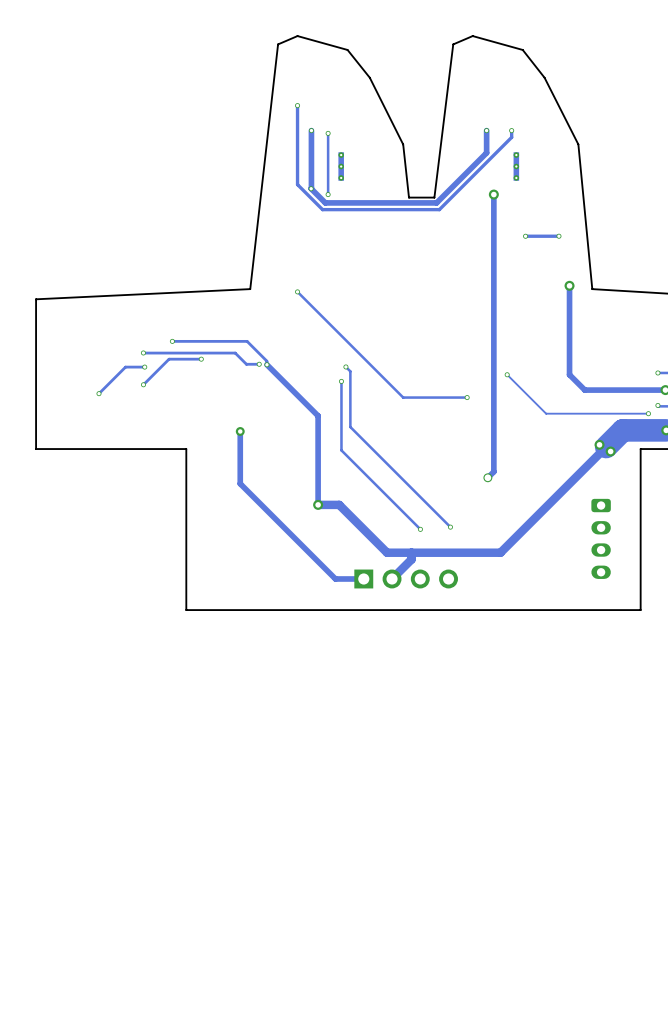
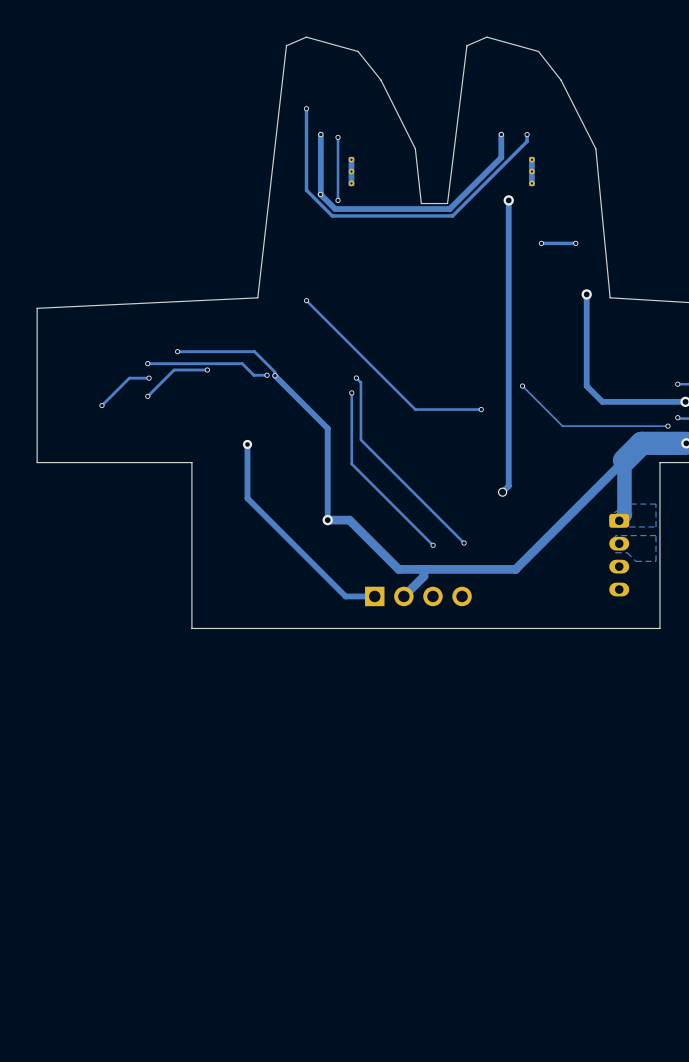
via: (599, 444) -> none
track: none -> (624, 460) (624, 515) (619, 520)
via: (610, 451) -> none
zone outline: none -> (655, 504) (655, 526) (610, 526) (610, 515) (627, 504) (655, 504)
zone outline: none -> (655, 535) (655, 561) (635, 561) (627, 552) (615, 552) (610, 544) (615, 535) (655, 535)

